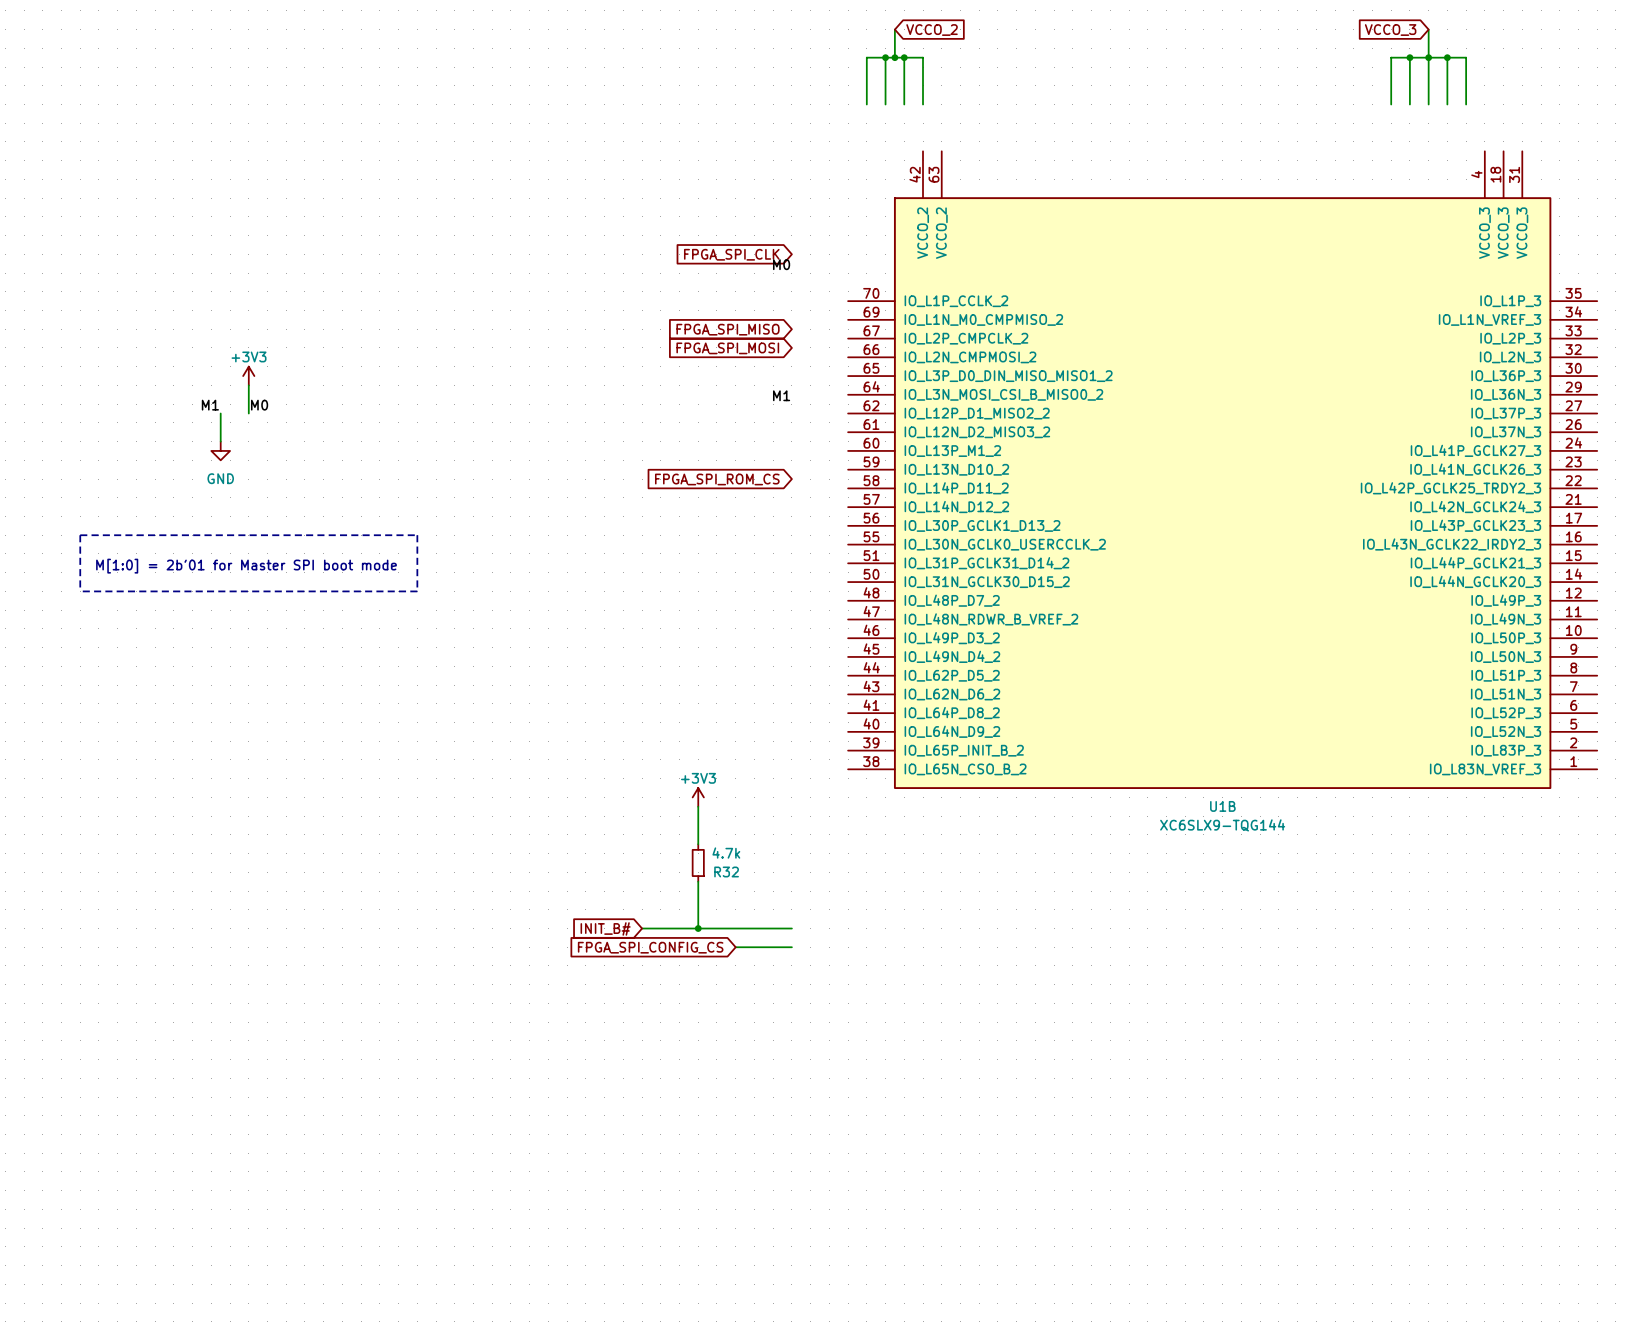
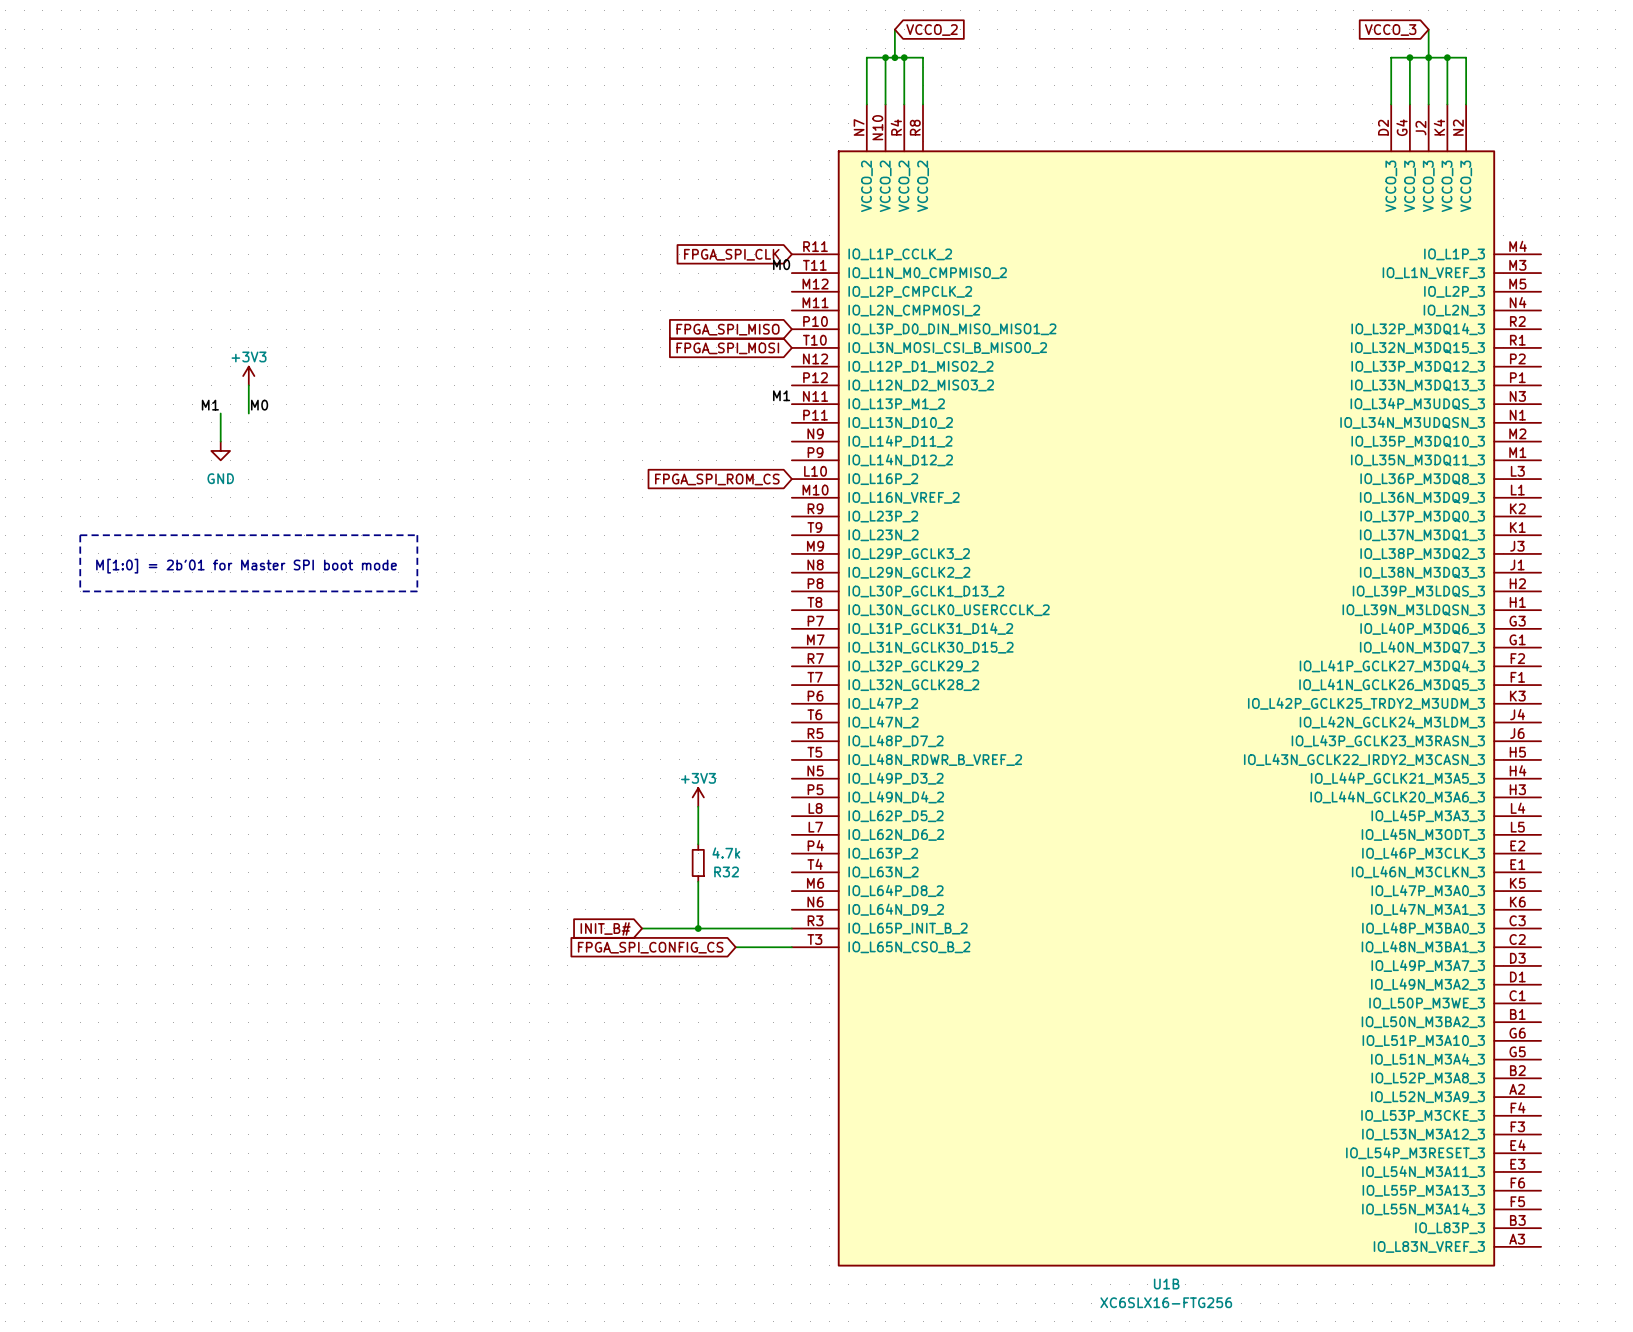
U1B symbol: [848, 151, 1598, 789] -> [791, 104, 1542, 1267]
U1B name position: U1B (1222, 806) -> U1B (1166, 1284)
U1B value: XC6SLX9-TQG144 (1222, 825) -> XC6SLX16-FTG256 (1166, 1302)

